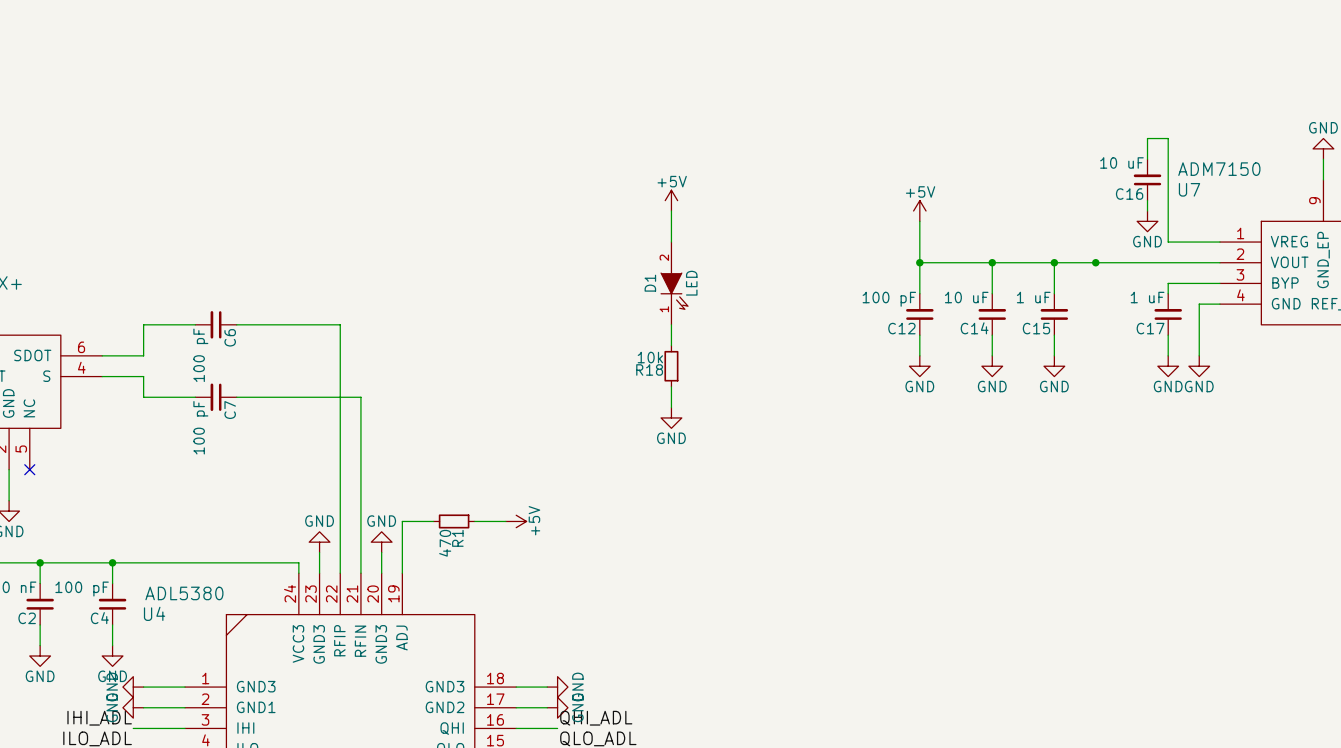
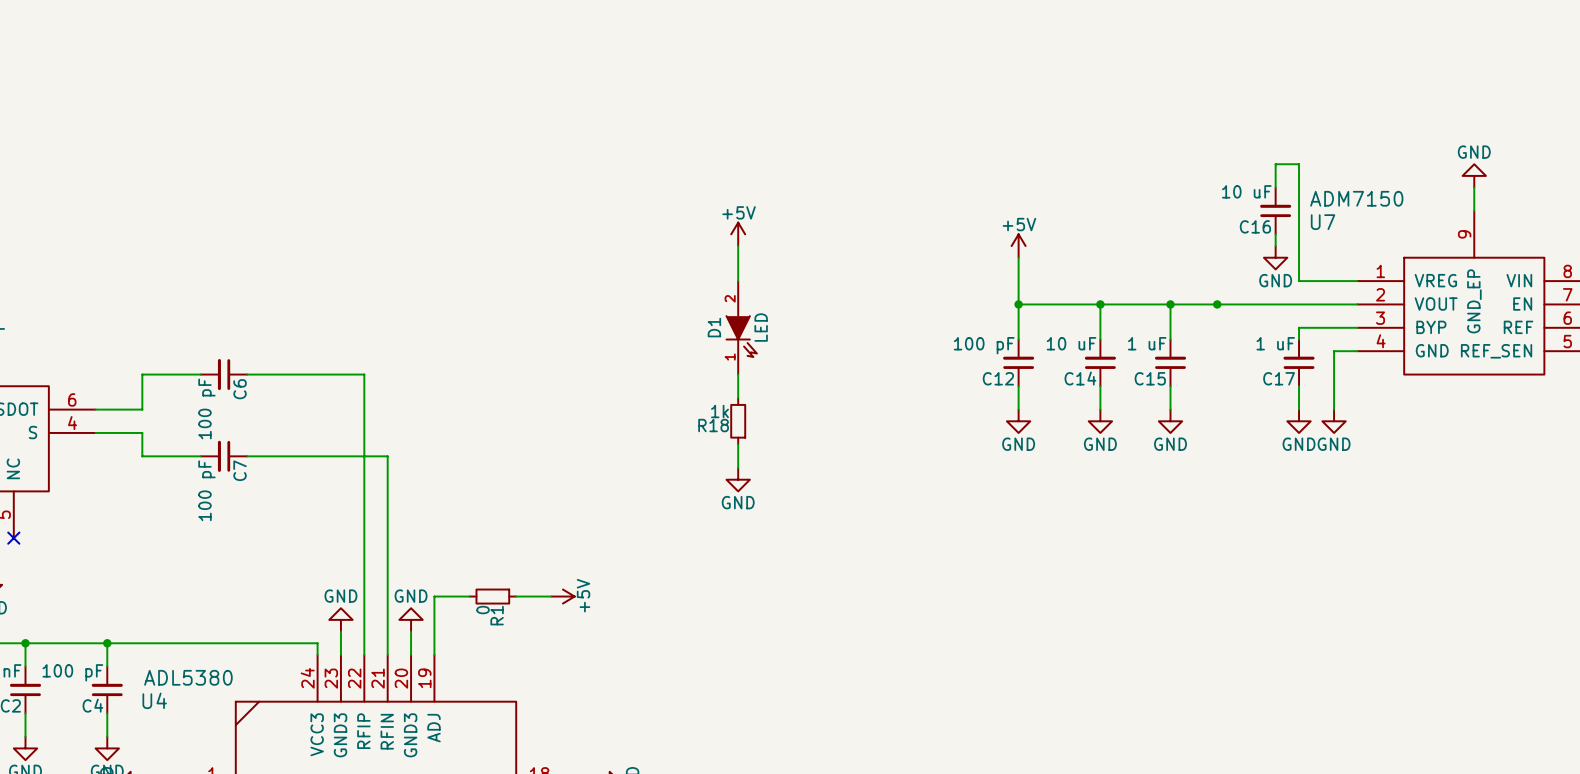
R18 value: 10k (650, 357) -> 1k (719, 411)
R1 value: 470 (445, 543) -> 0 (483, 610)

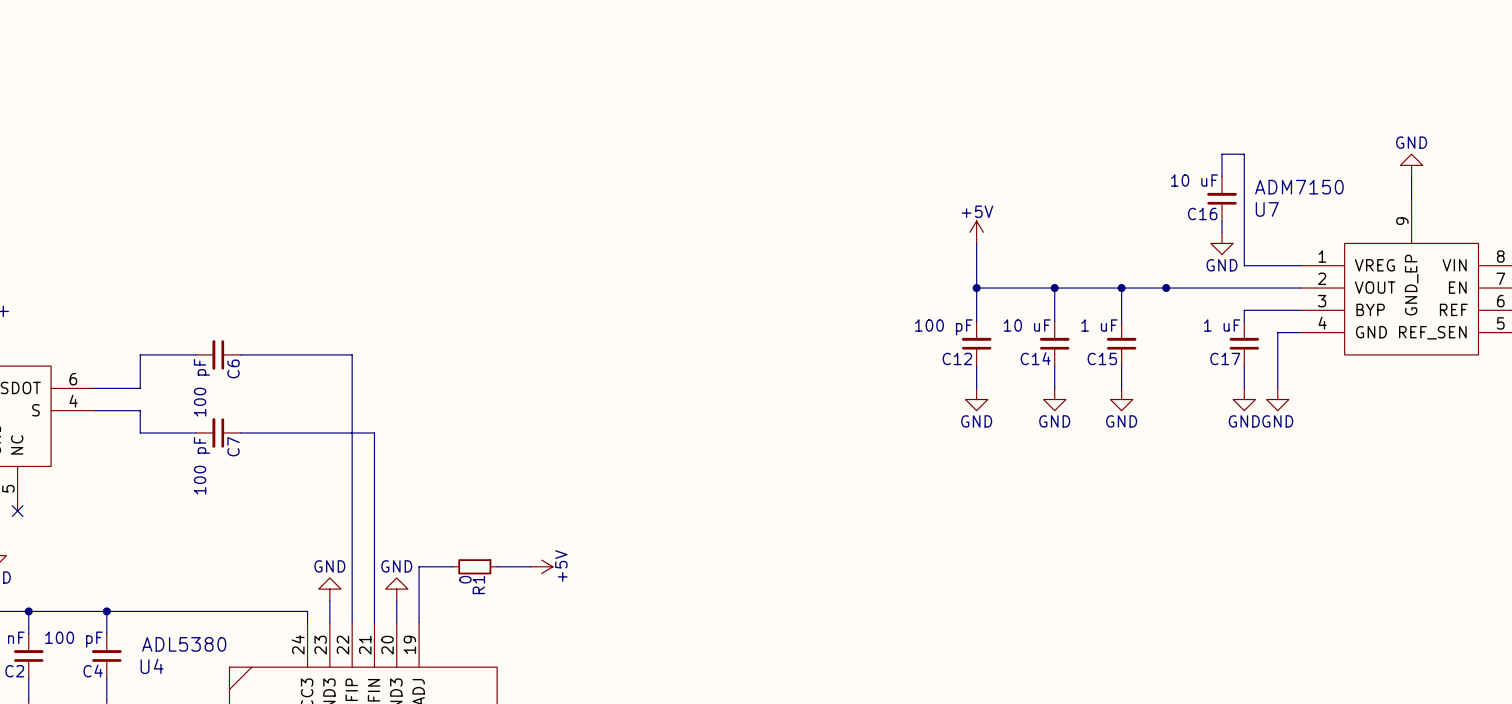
power symbol: +5V (738, 234) -> none
wire: (738, 246) (738, 281) -> none
D1: LED (741, 327) -> none
wire: (738, 374) (738, 397) -> none
R18: 1k (738, 421) -> none
wire: (738, 444) (738, 468) -> none
power symbol: GND (738, 479) -> none

